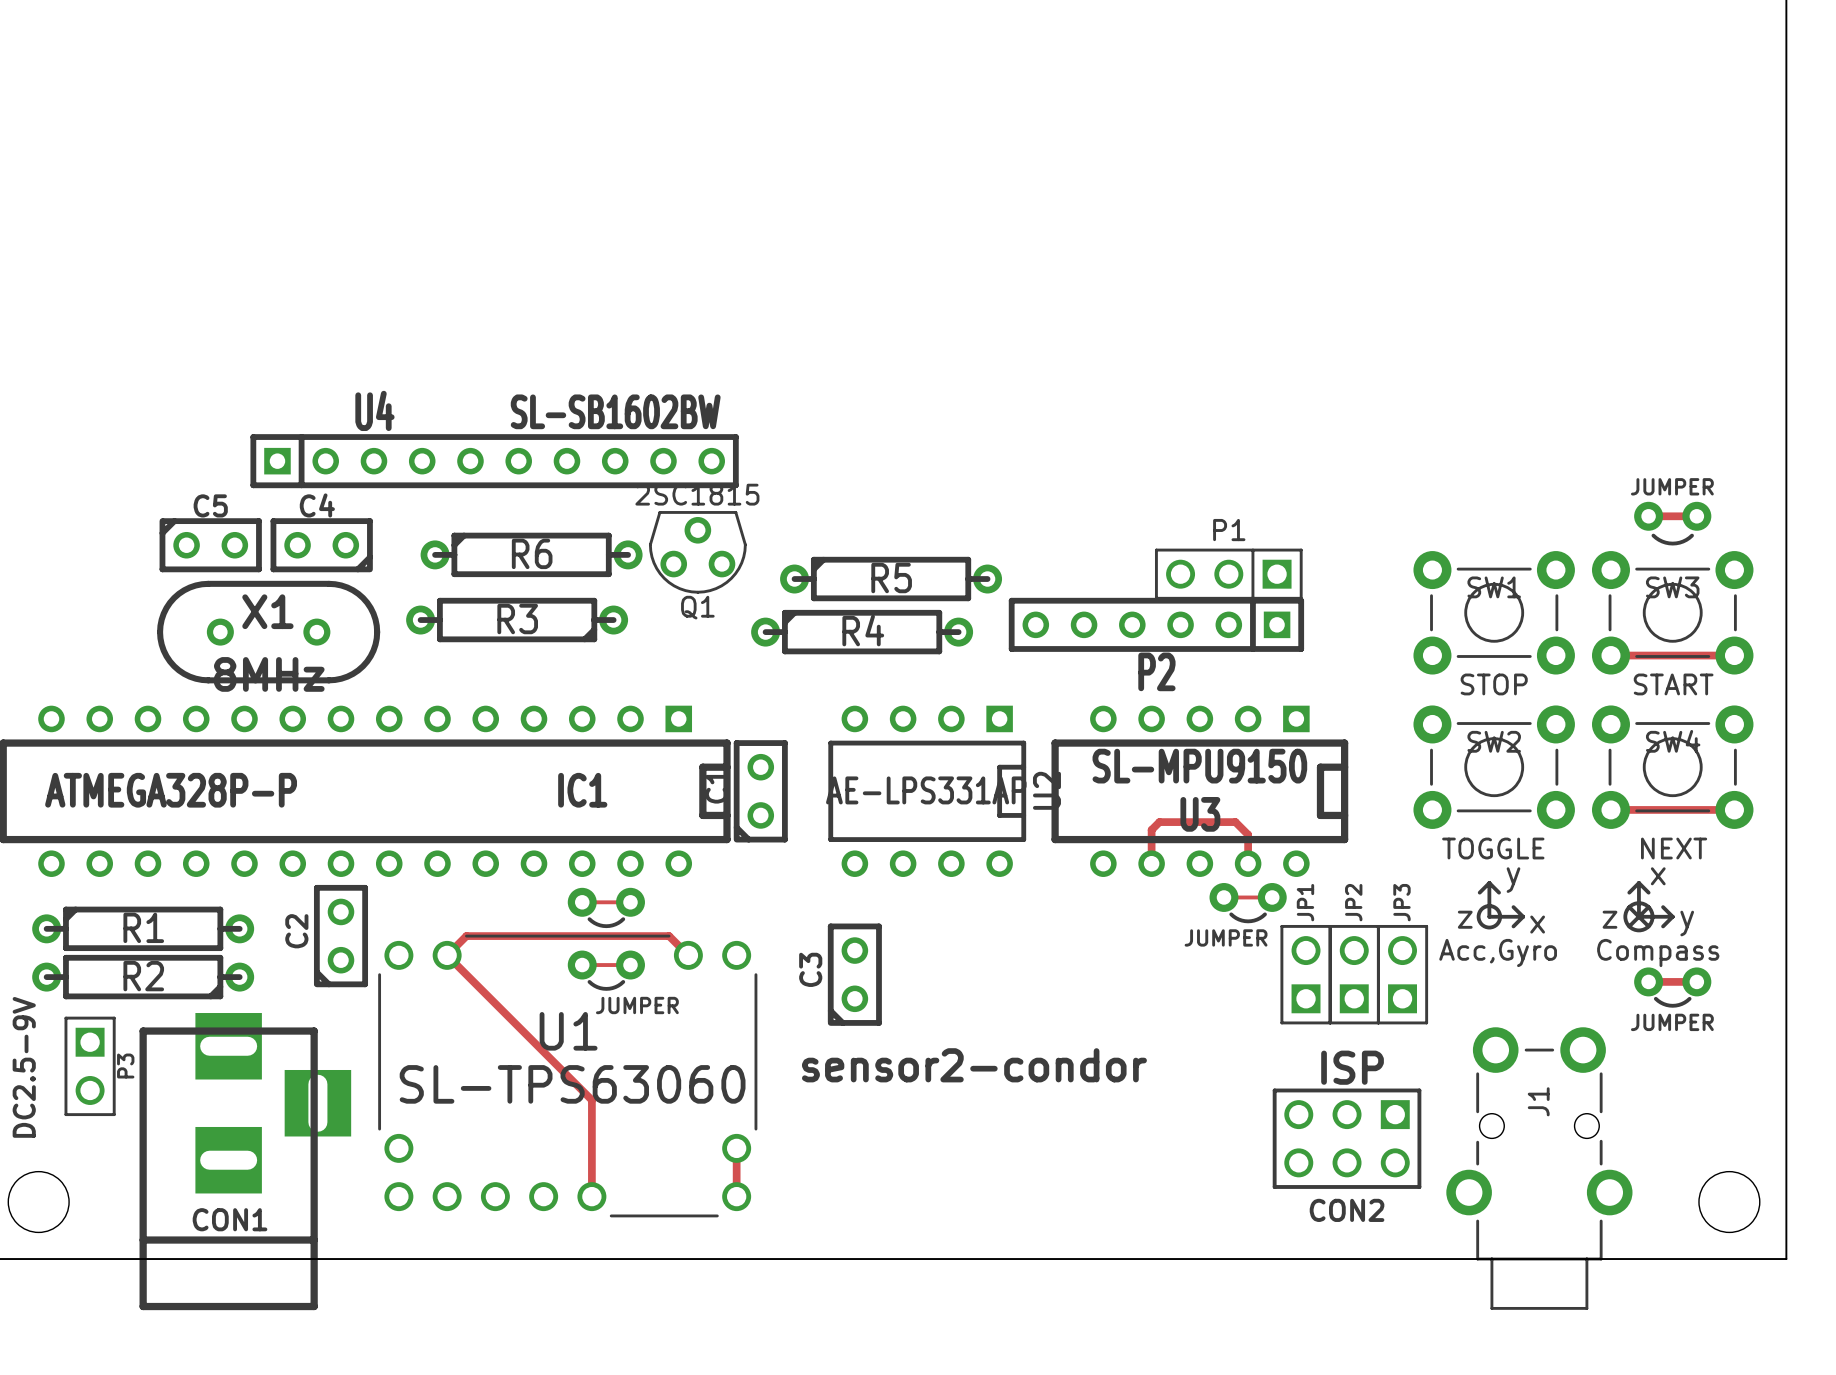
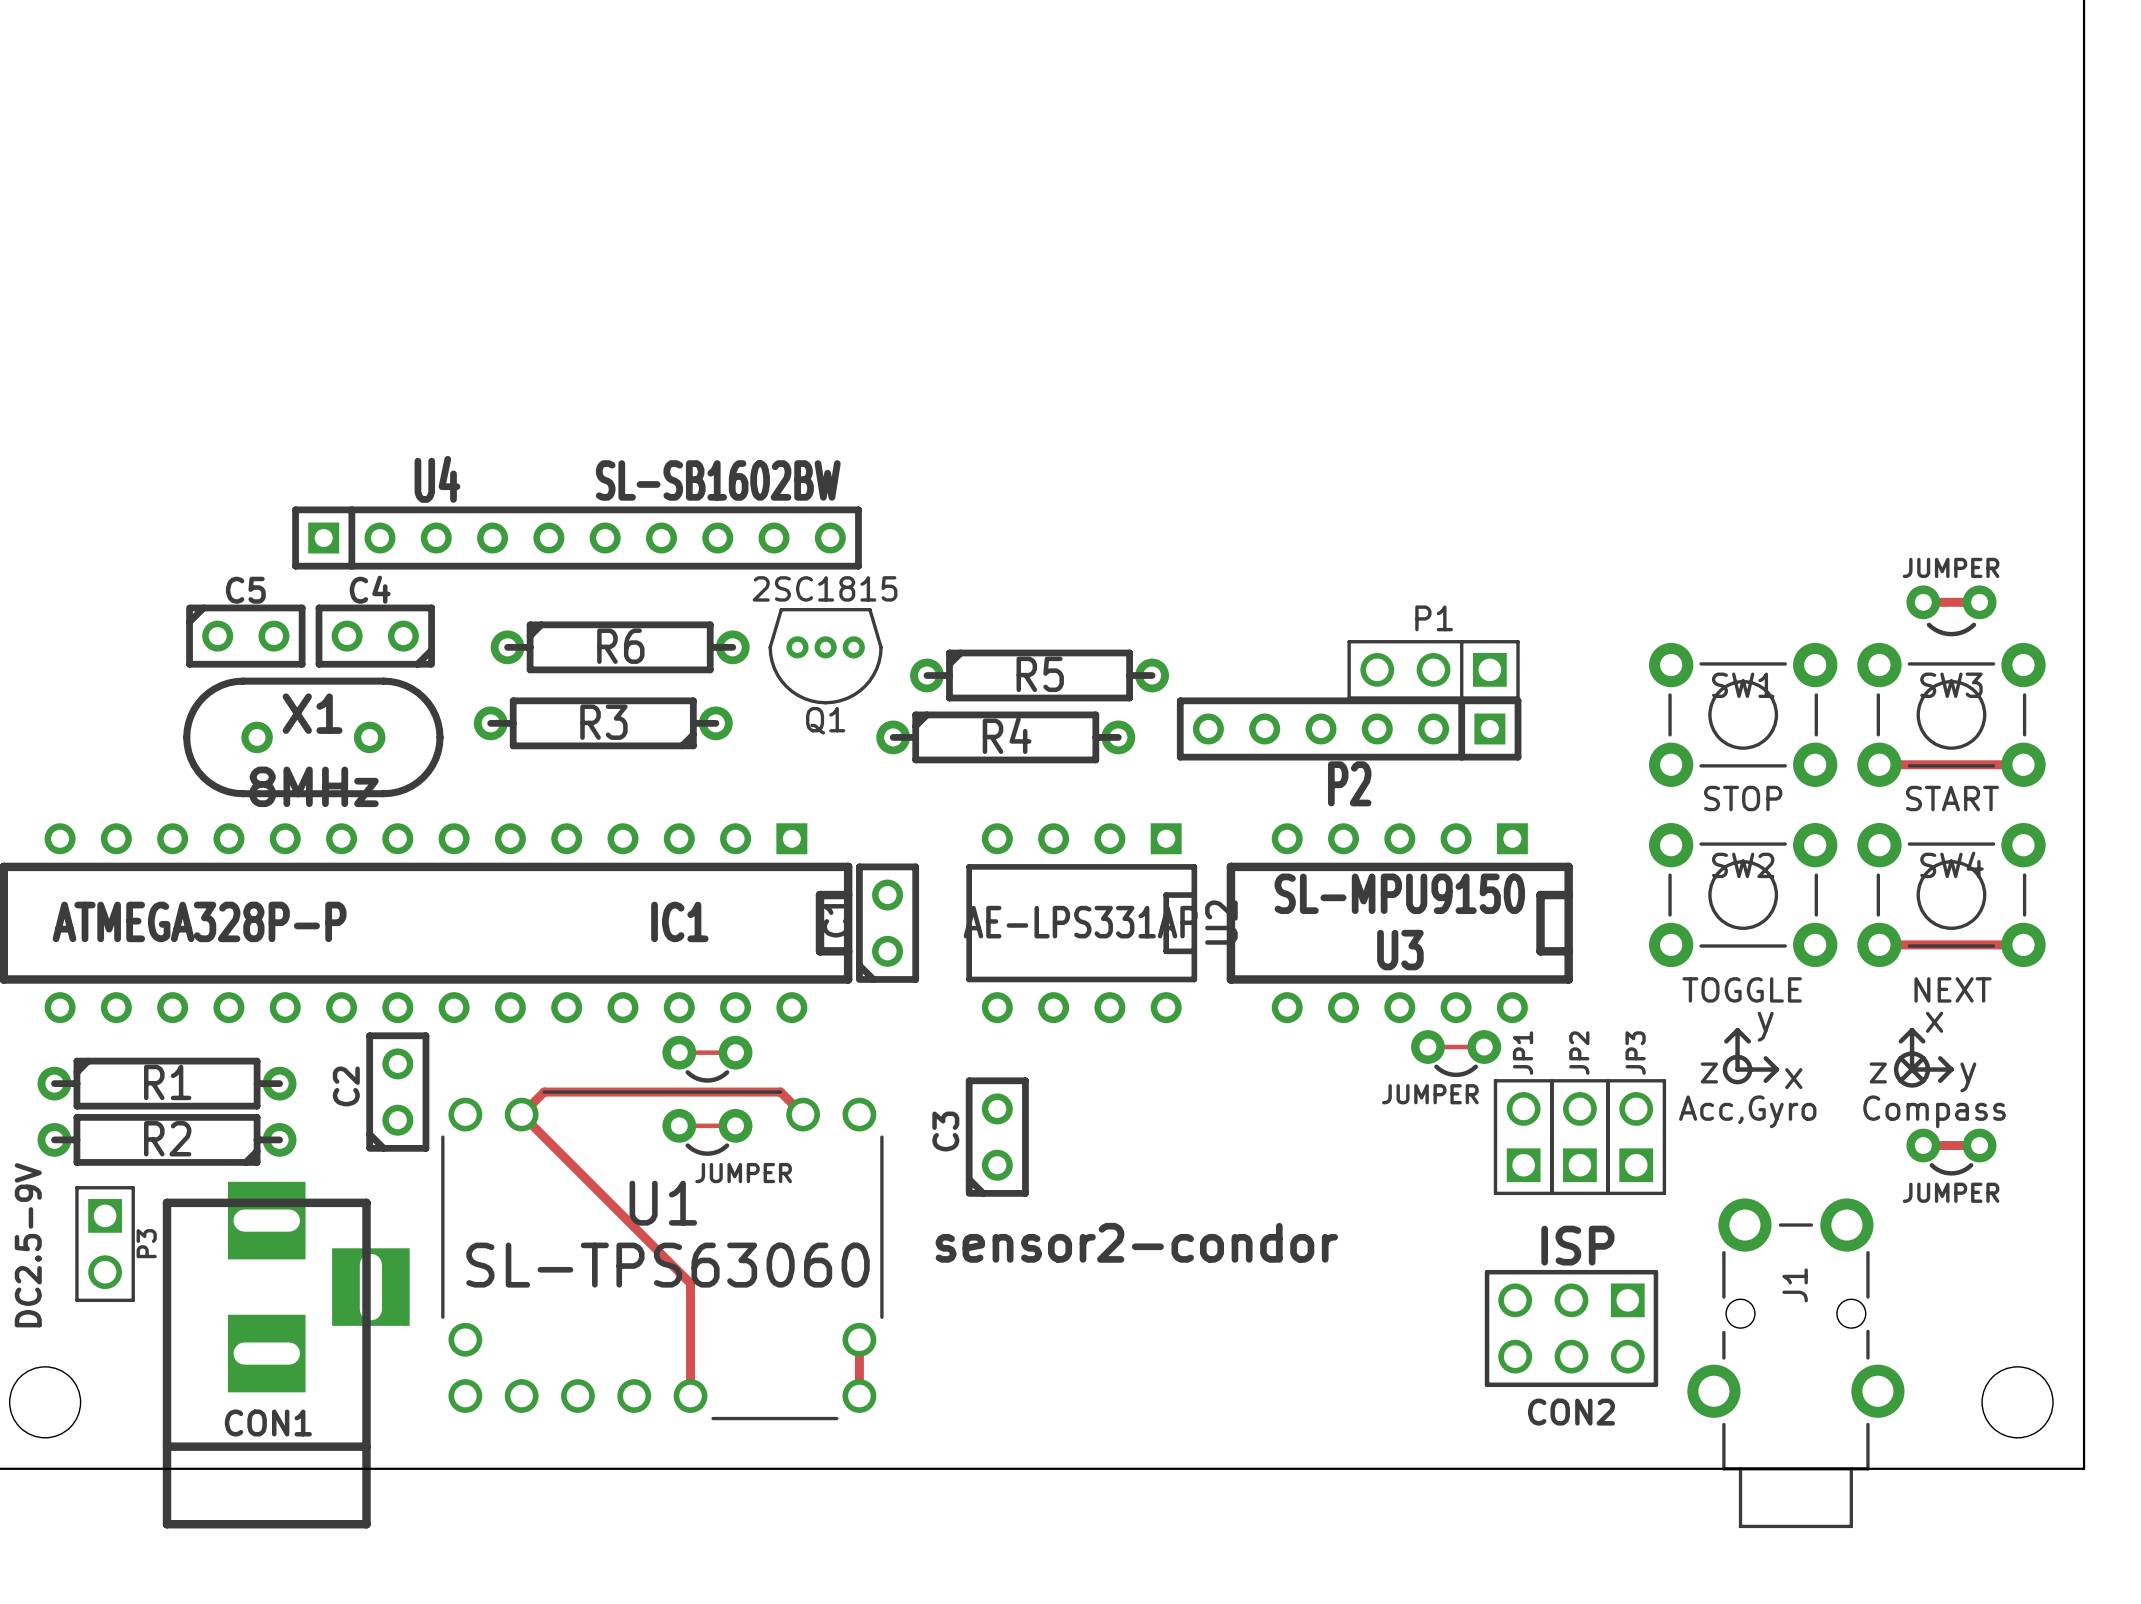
Q1 footprint: [648, 511, 747, 594] -> [768, 608, 883, 705]
track: (1151, 863) (1151, 829) (1159, 822) (1235, 822) (1248, 834) (1248, 863) -> none

